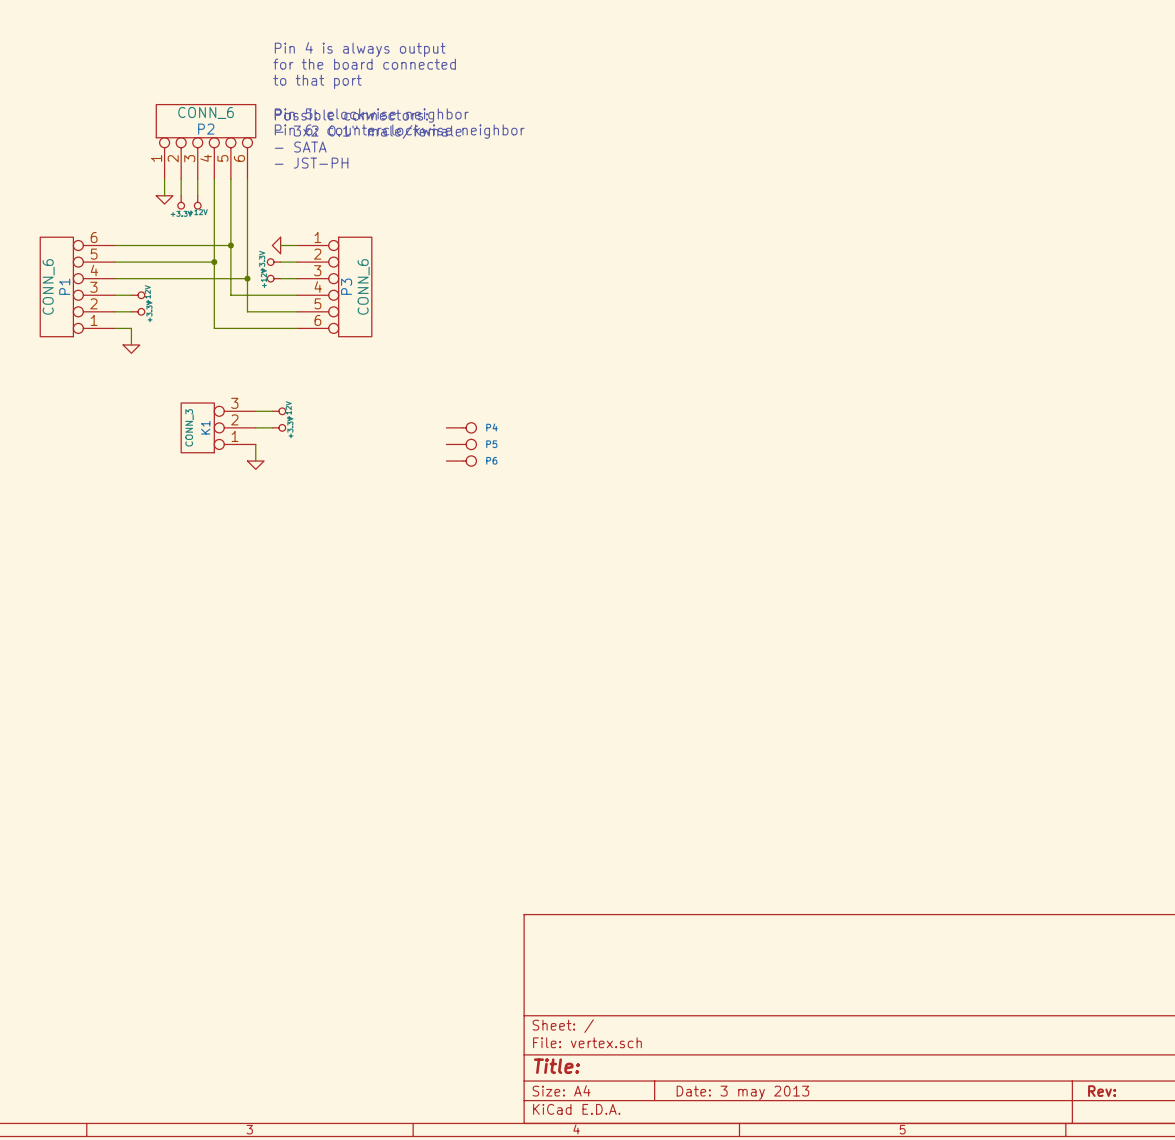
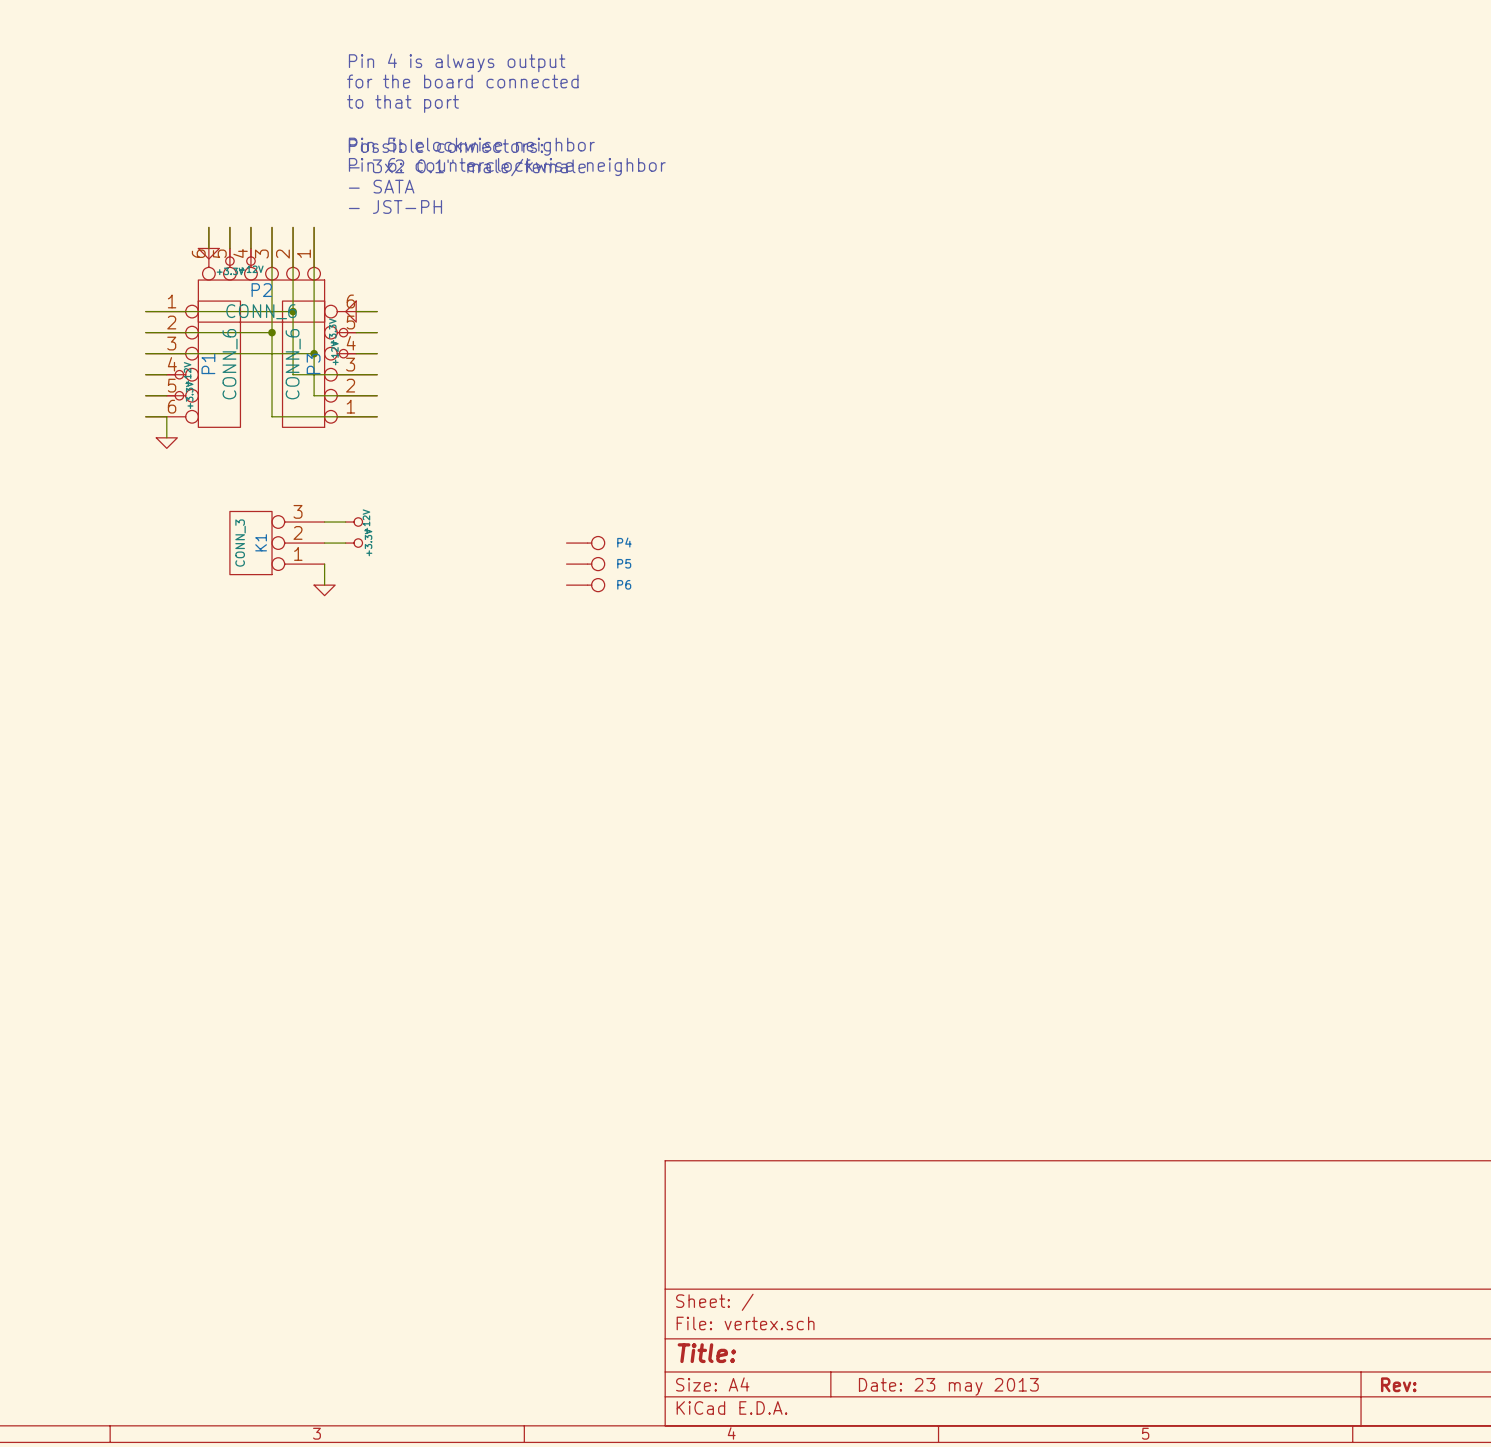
P2 rotation: 0° (206, 121) -> 180° (261, 301)
P2 position: (206, 141) -> (261, 274)
P1 rotation: 0° (56, 286) -> 180° (219, 364)
P1 position: (77, 286) -> (193, 364)
P3 position: (334, 286) -> (329, 364)
P3 rotation: 0° (355, 286) -> 180° (303, 364)
title block: Date: 3 may 2013 (742, 1092) -> Date: 23 may 2013 (948, 1386)

